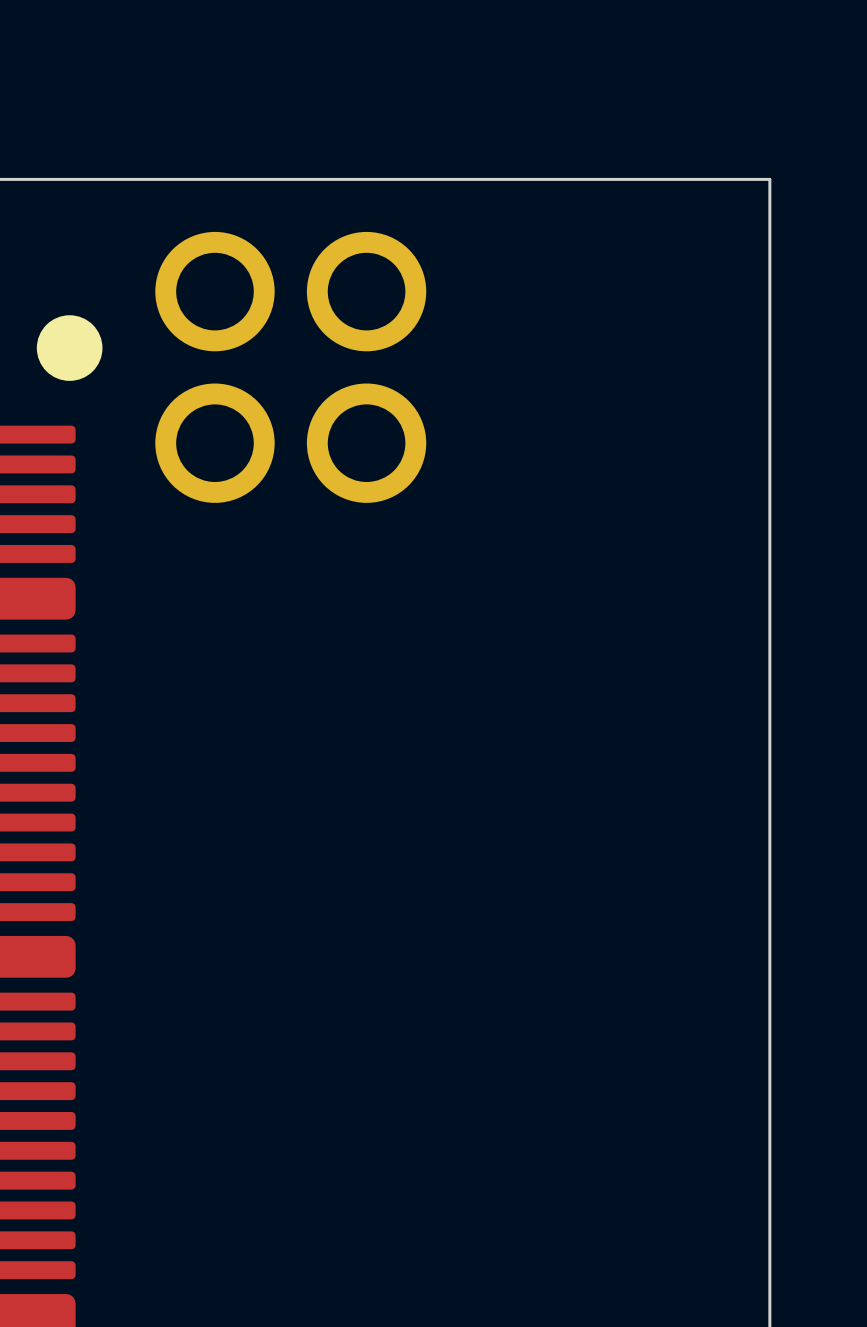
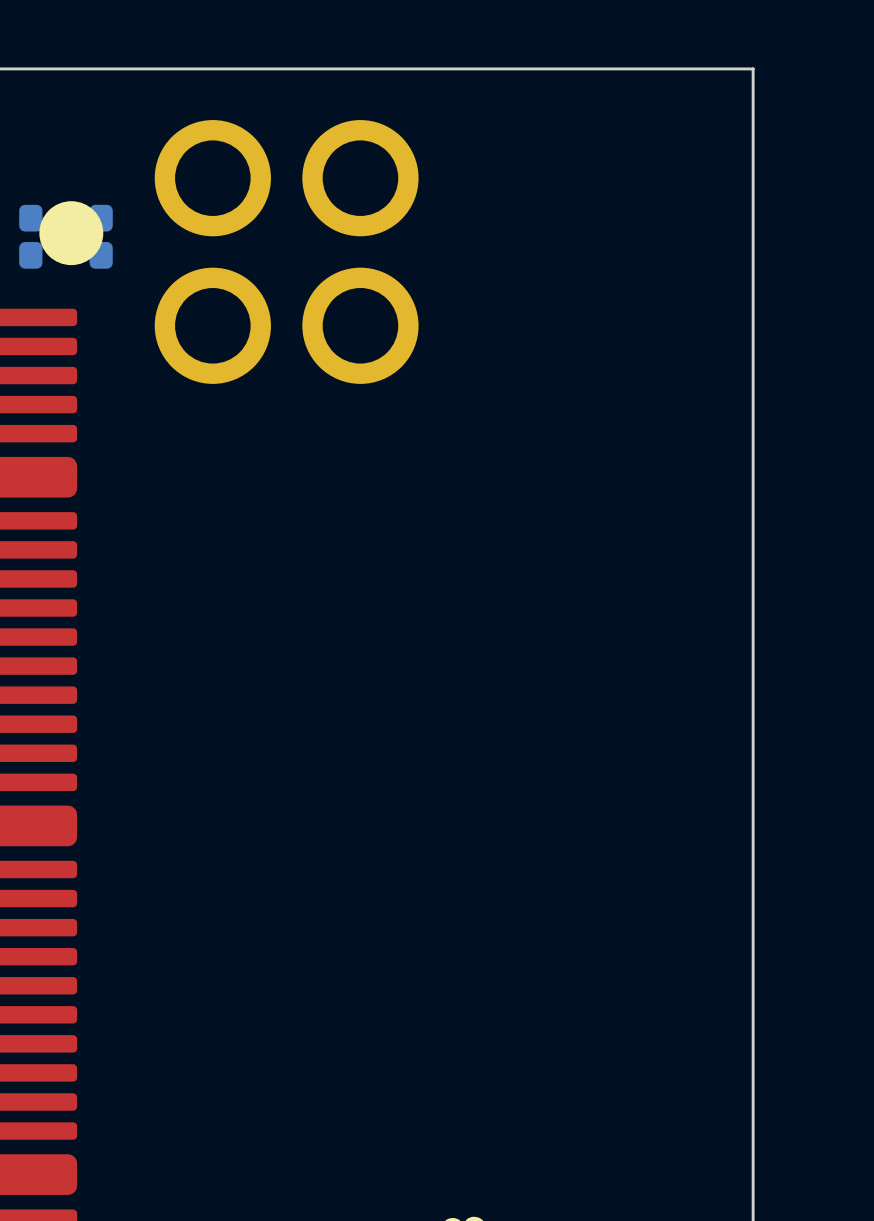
part: none -> (30, 236)
part: none -> (101, 236)

